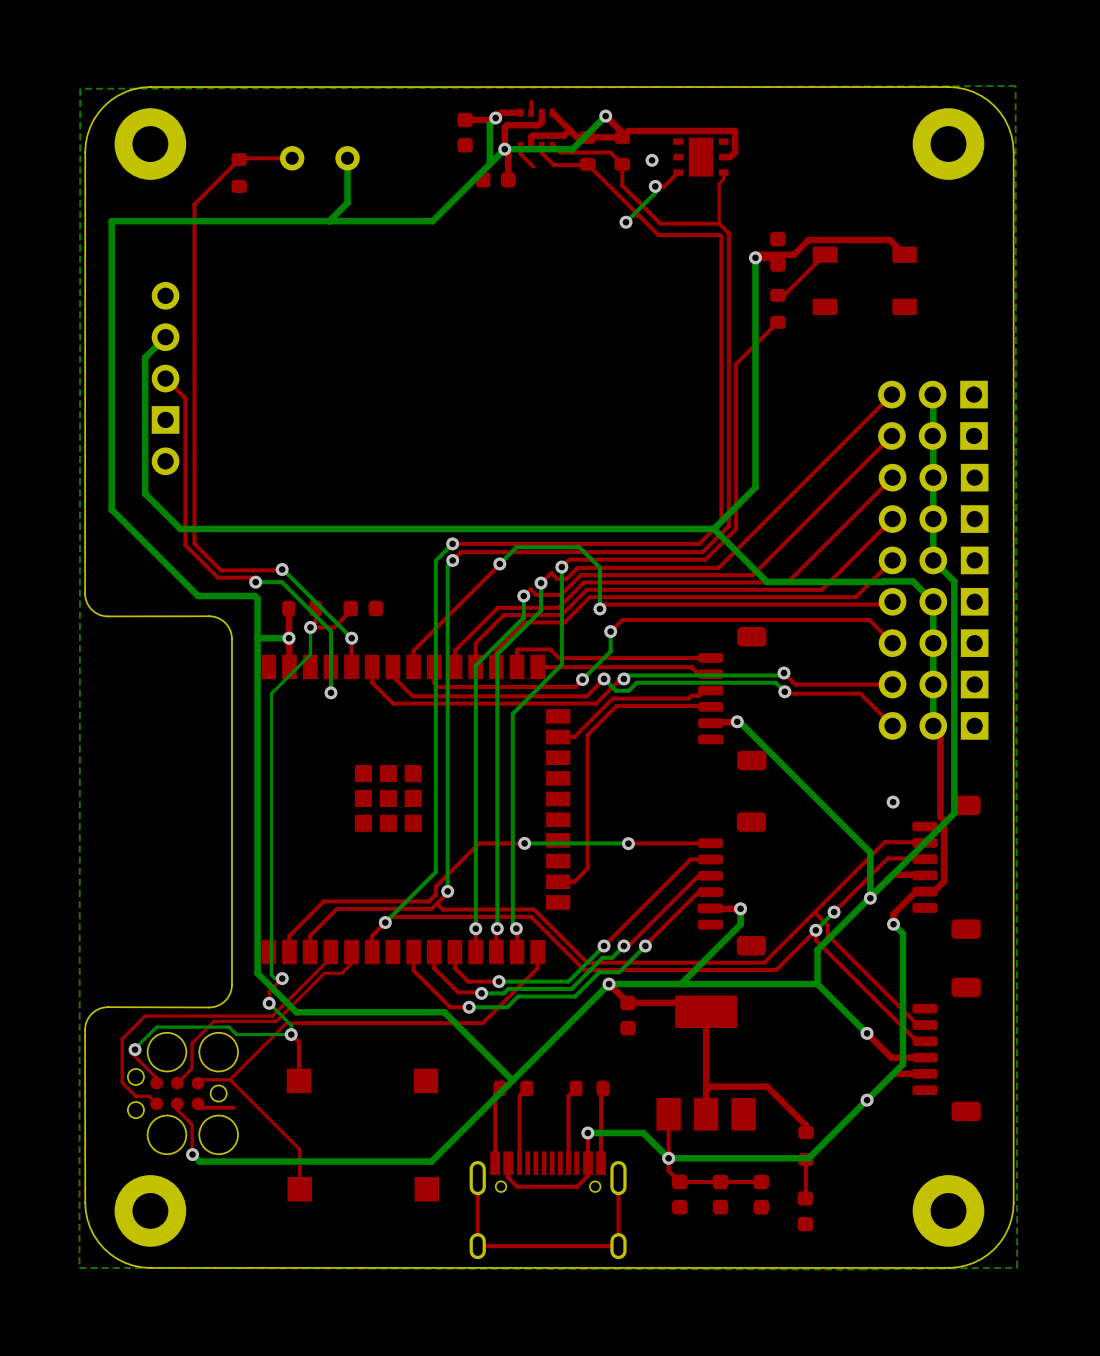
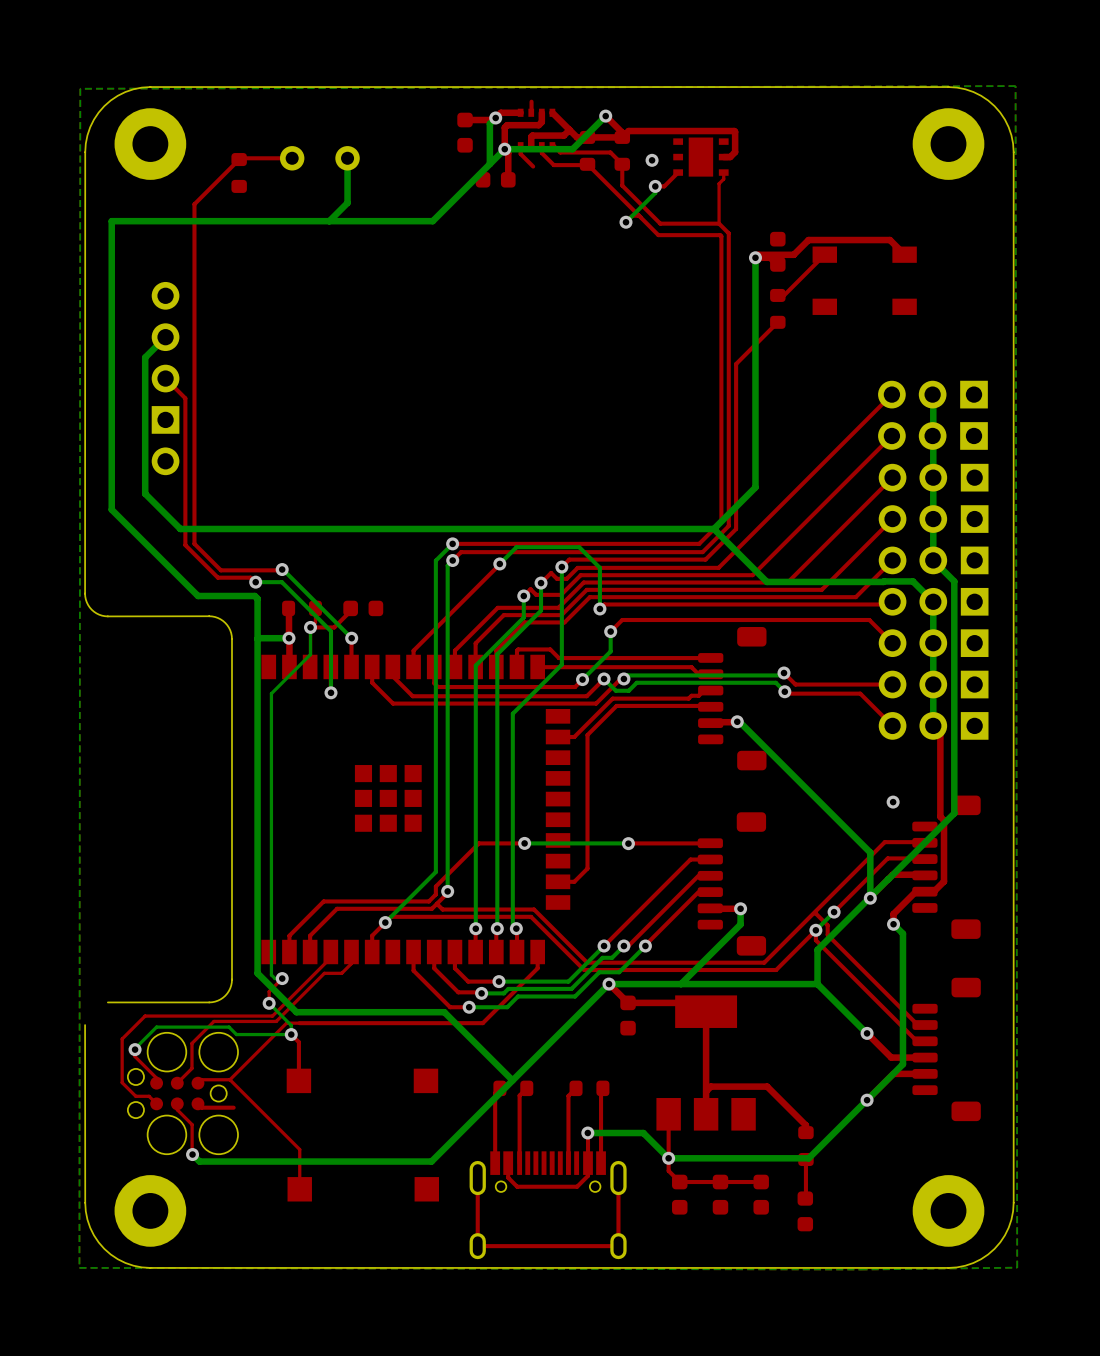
board edge: (231, 979) (228, 996) (217, 1005) (209, 1007) (104, 1007) (91, 1013) (86, 1021) (85, 1029) -> (231, 979) (230, 988) (225, 995) (212, 1002) (107, 1002)

